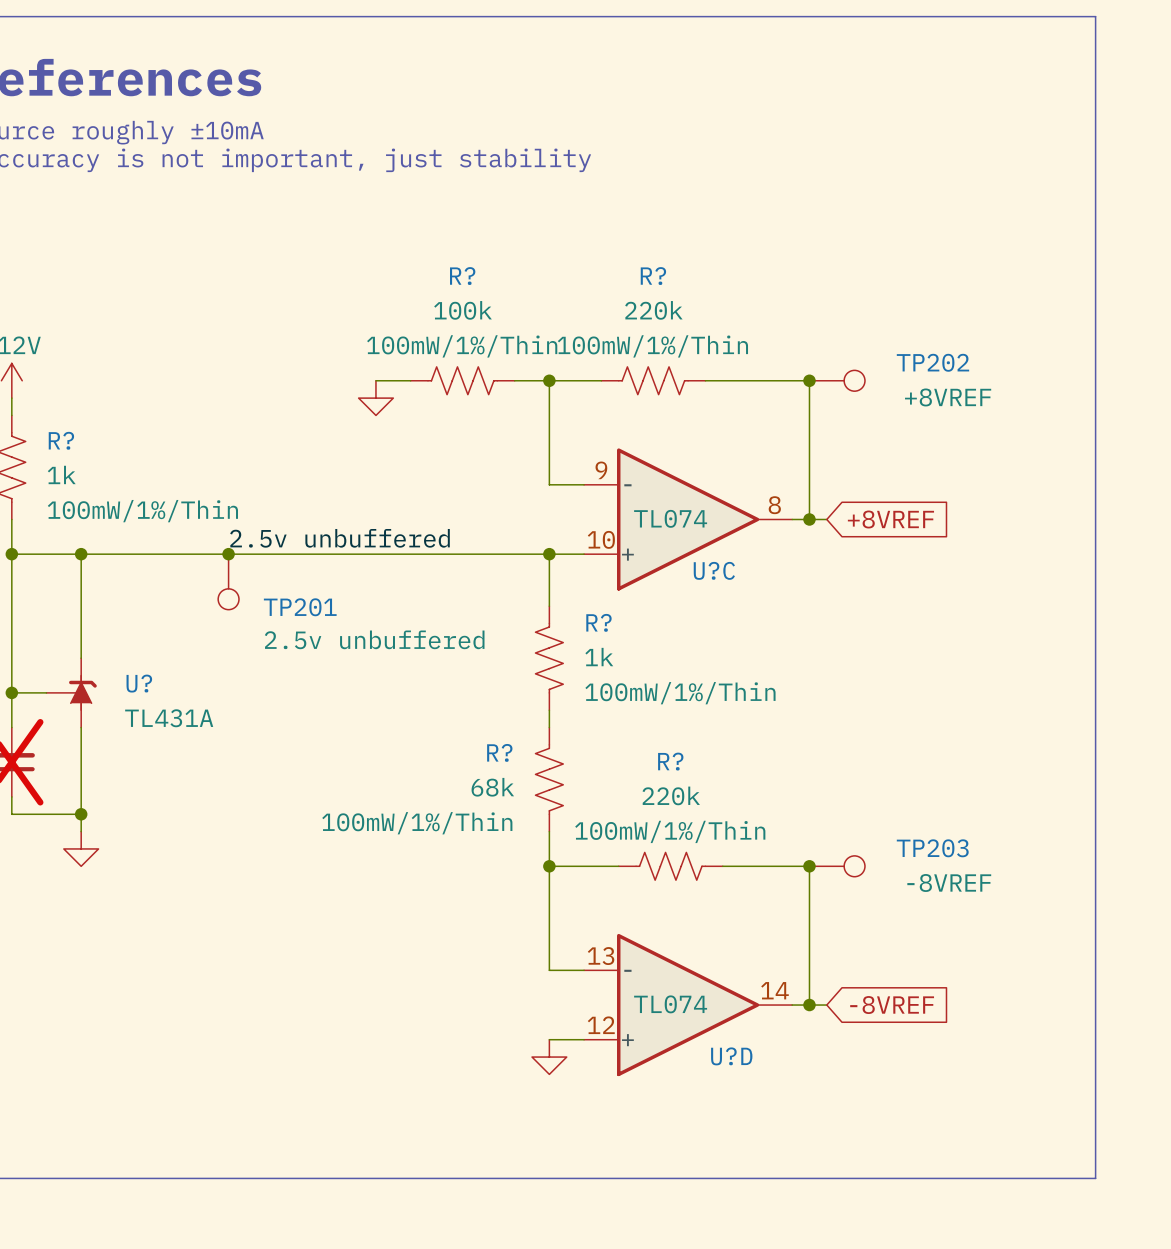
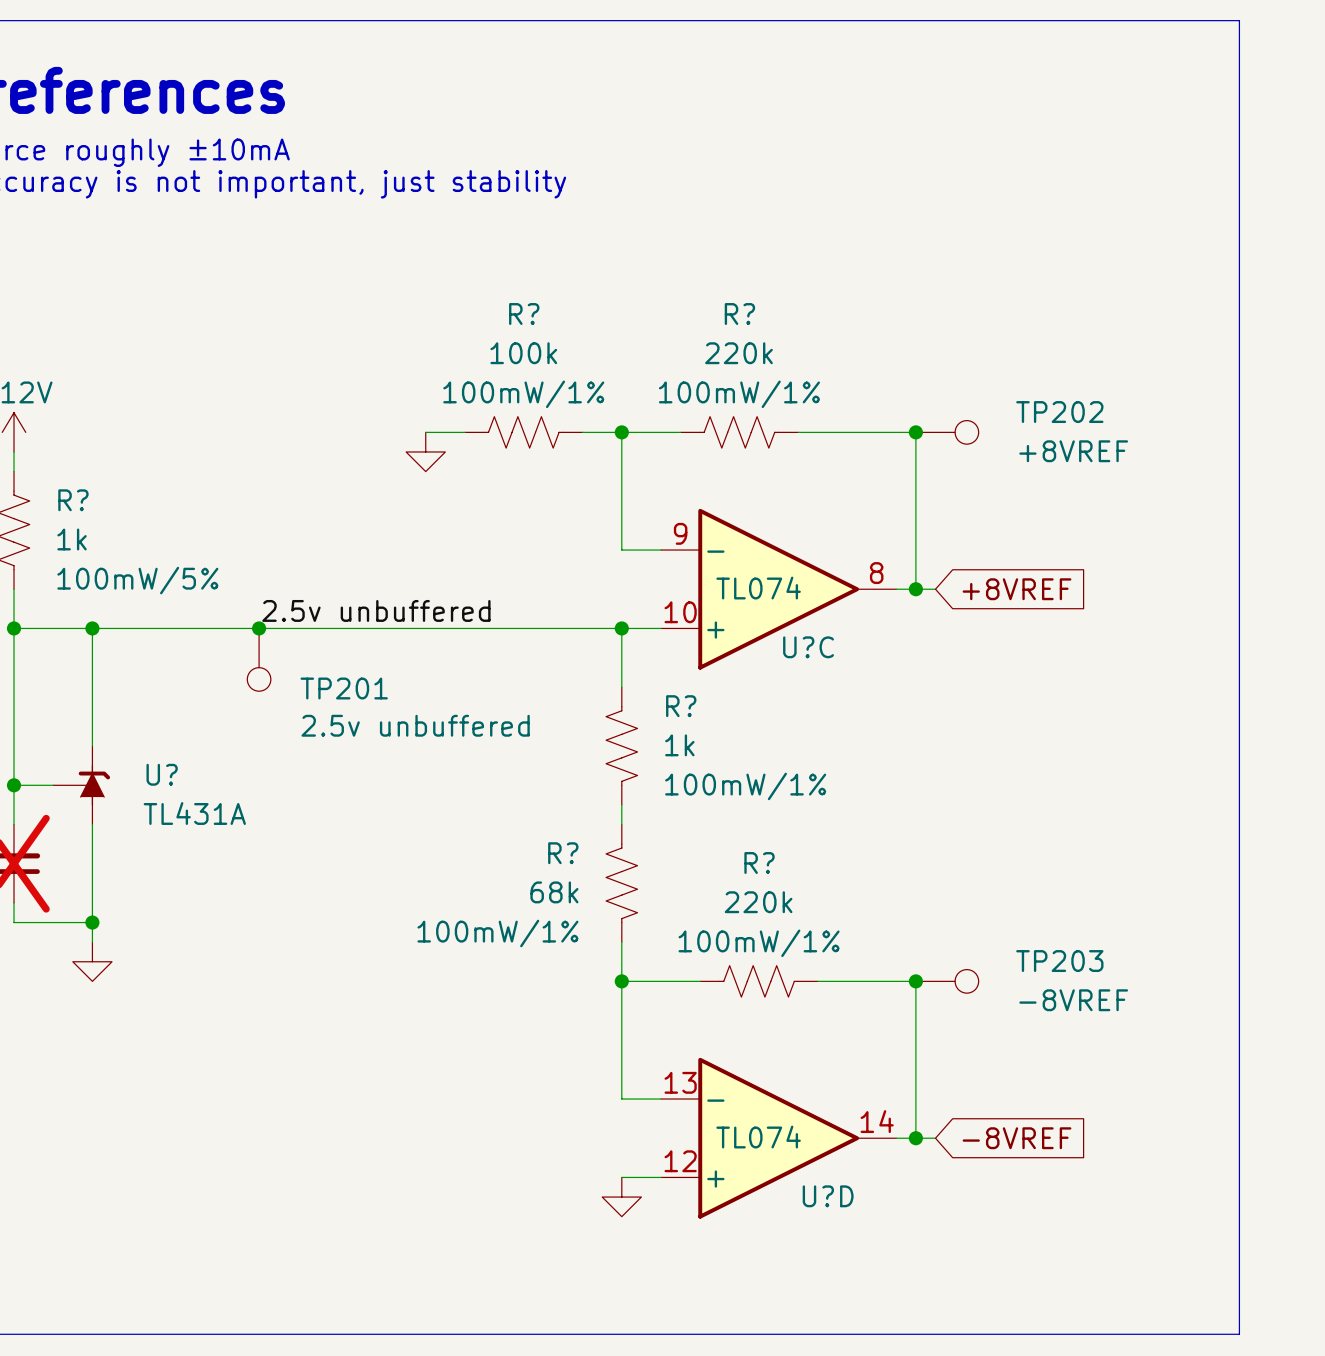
R? text: 100mW/1%/Thin (462, 346) -> 100mW/1% (523, 394)
R? text: 100mW/1%/Thin (652, 346) -> 100mW/1% (739, 394)
R? text: 100mW/1%/Thin (142, 511) -> 100mW/5% (137, 580)
R? text: 100mW/1%/Thin (680, 693) -> 100mW/1% (745, 786)
R? text: 100mW/1%/Thin (417, 823) -> 100mW/1% (497, 933)
R? text: 100mW/1%/Thin (670, 831) -> 100mW/1% (759, 943)

